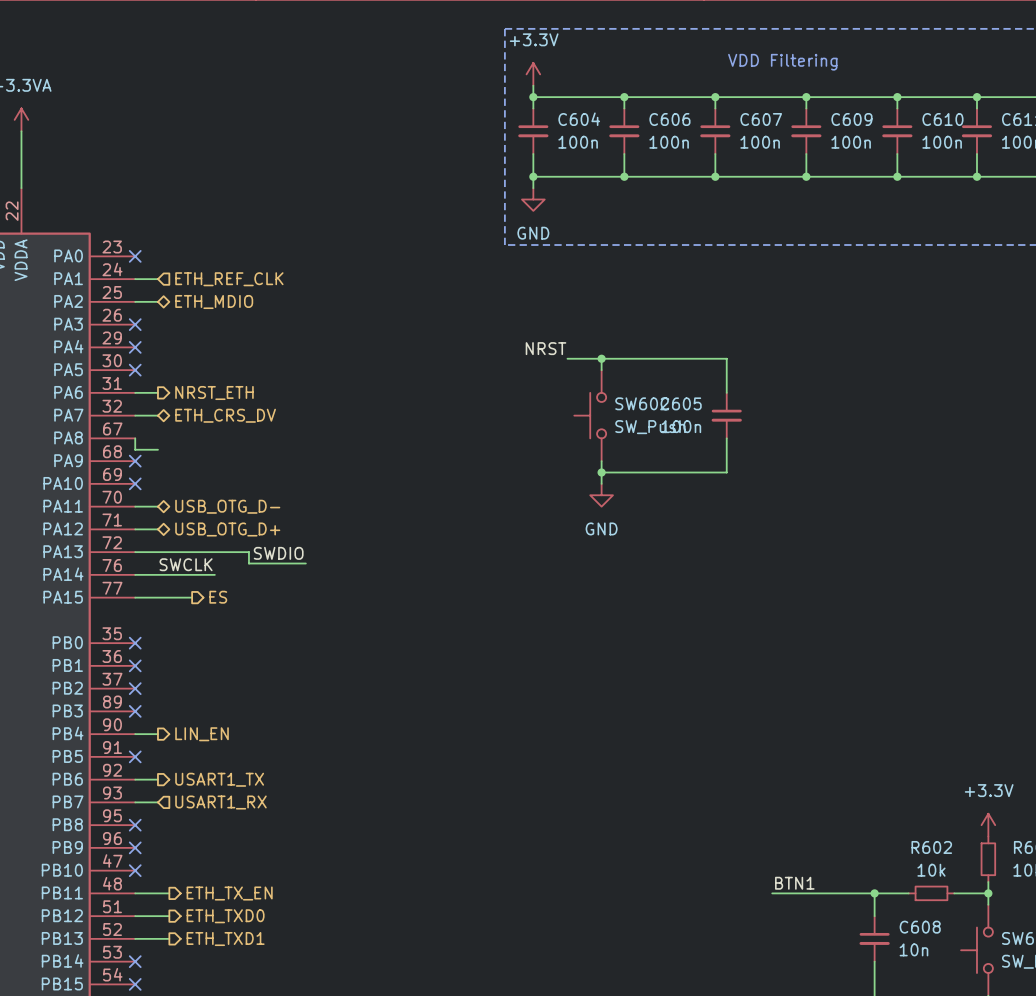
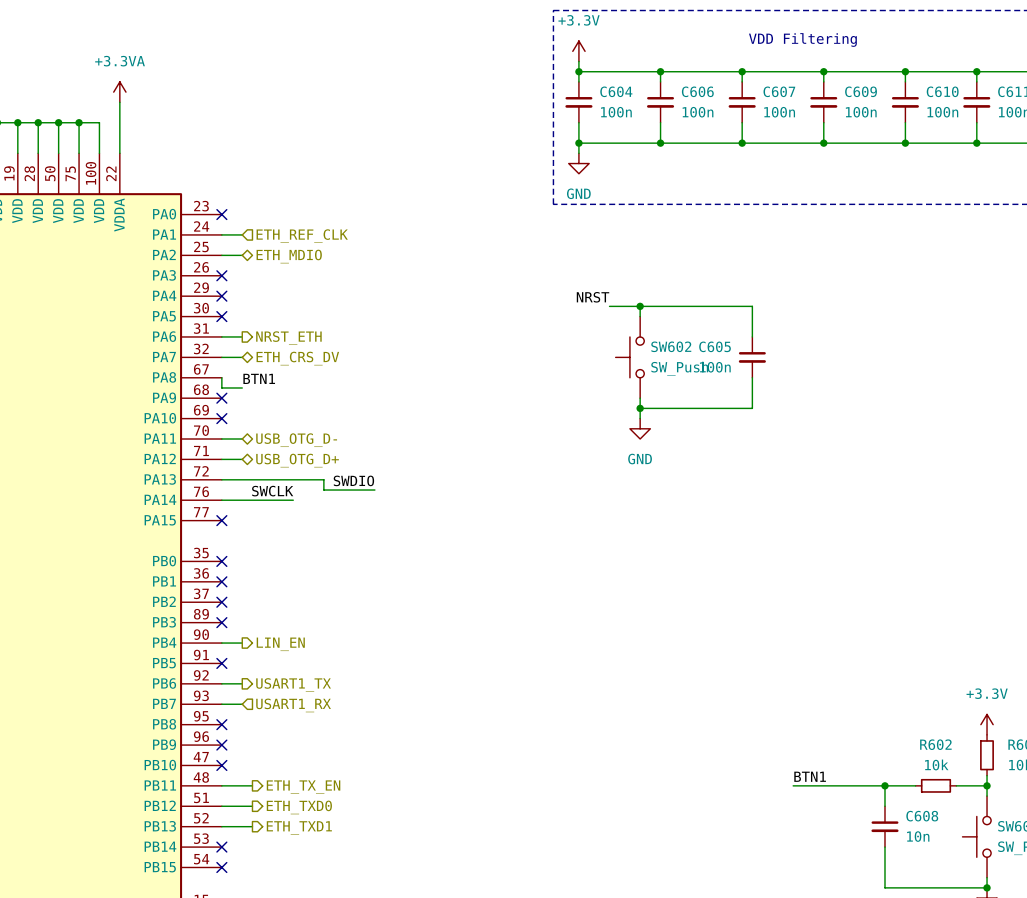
label: none -> BTN1 (259, 378)
wire: (135, 597) (192, 597) -> none
no-connect mark: none -> (221, 520)
hierarchical label: ES (218, 597) -> none

